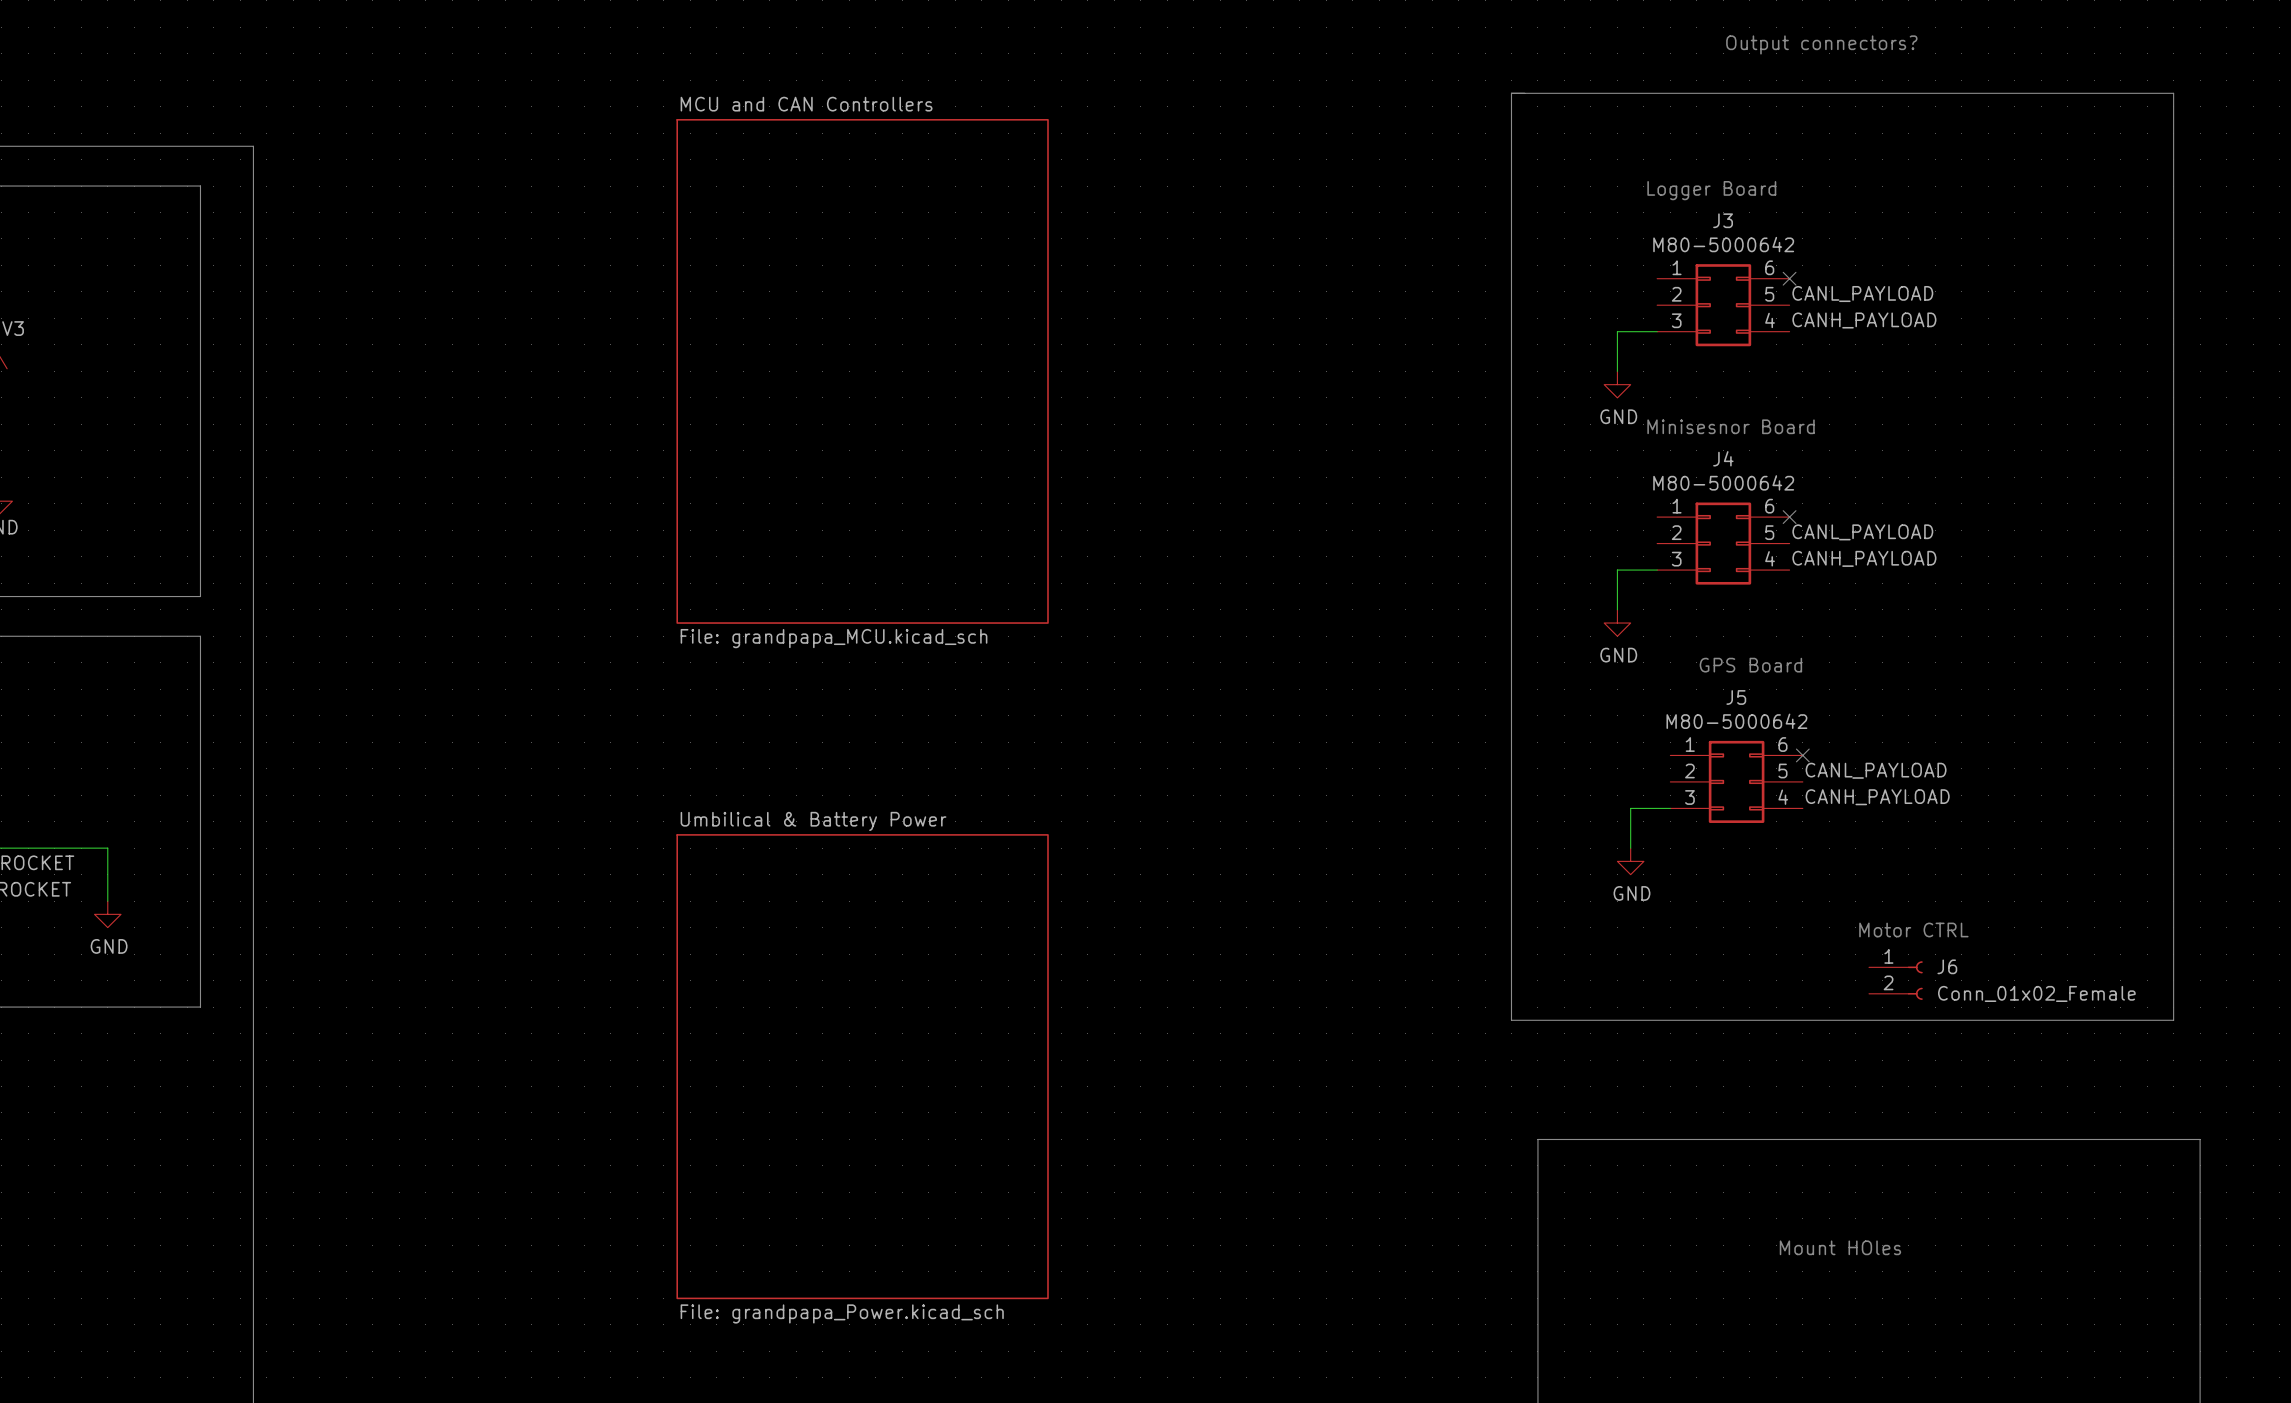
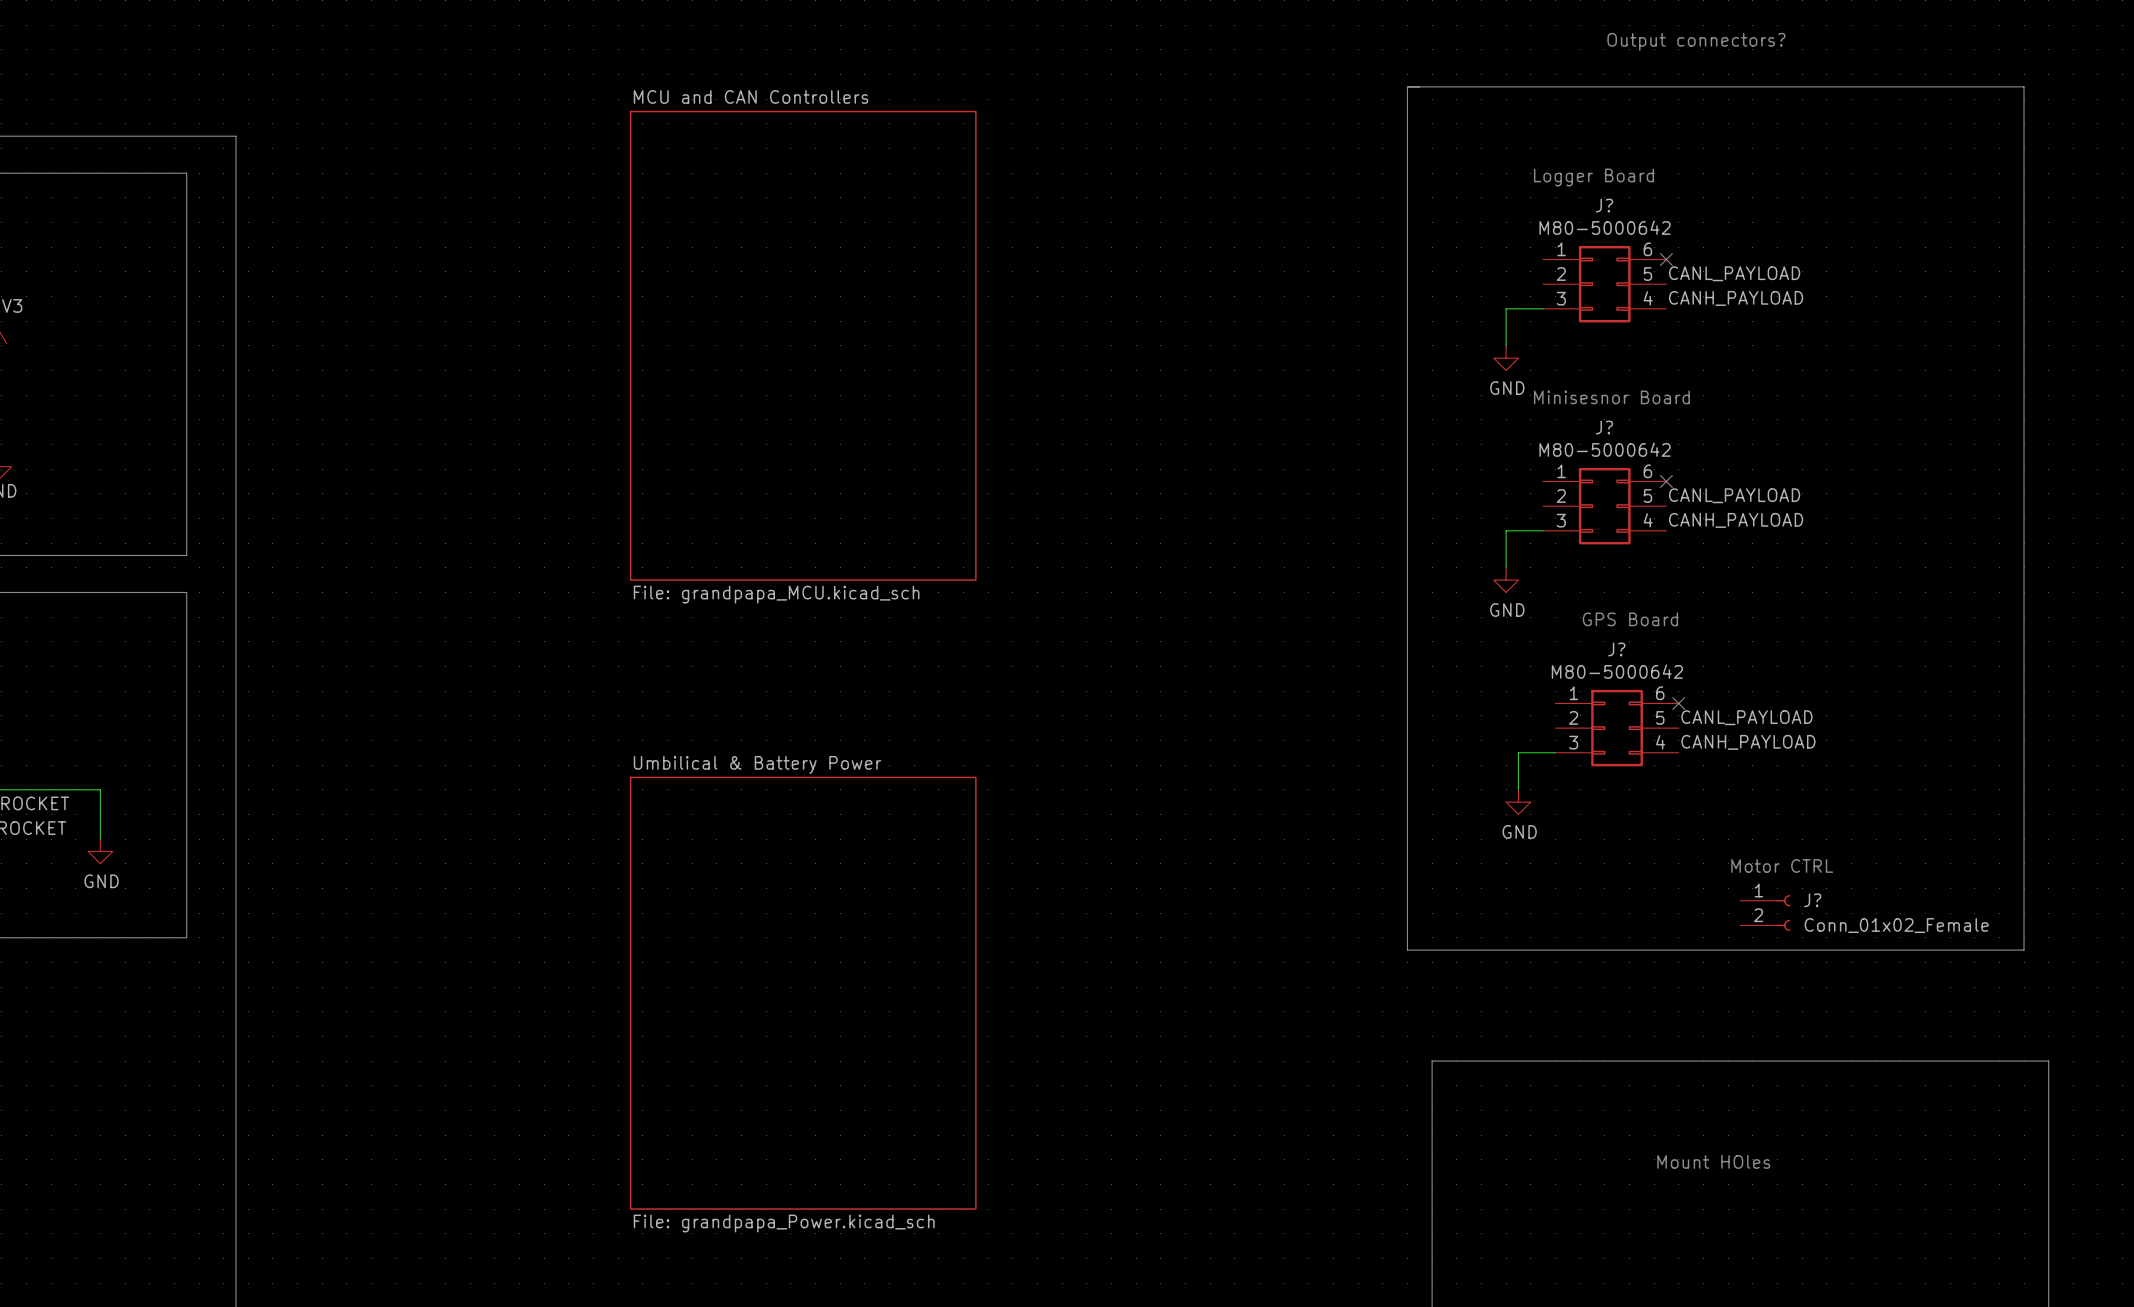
J3 name: J3 (1723, 220) -> J? (1604, 205)
J4 name: J4 (1723, 458) -> J? (1604, 427)
J5 name: J5 (1736, 697) -> J? (1616, 649)
J6 name: J6 (1947, 966) -> J? (1812, 900)

